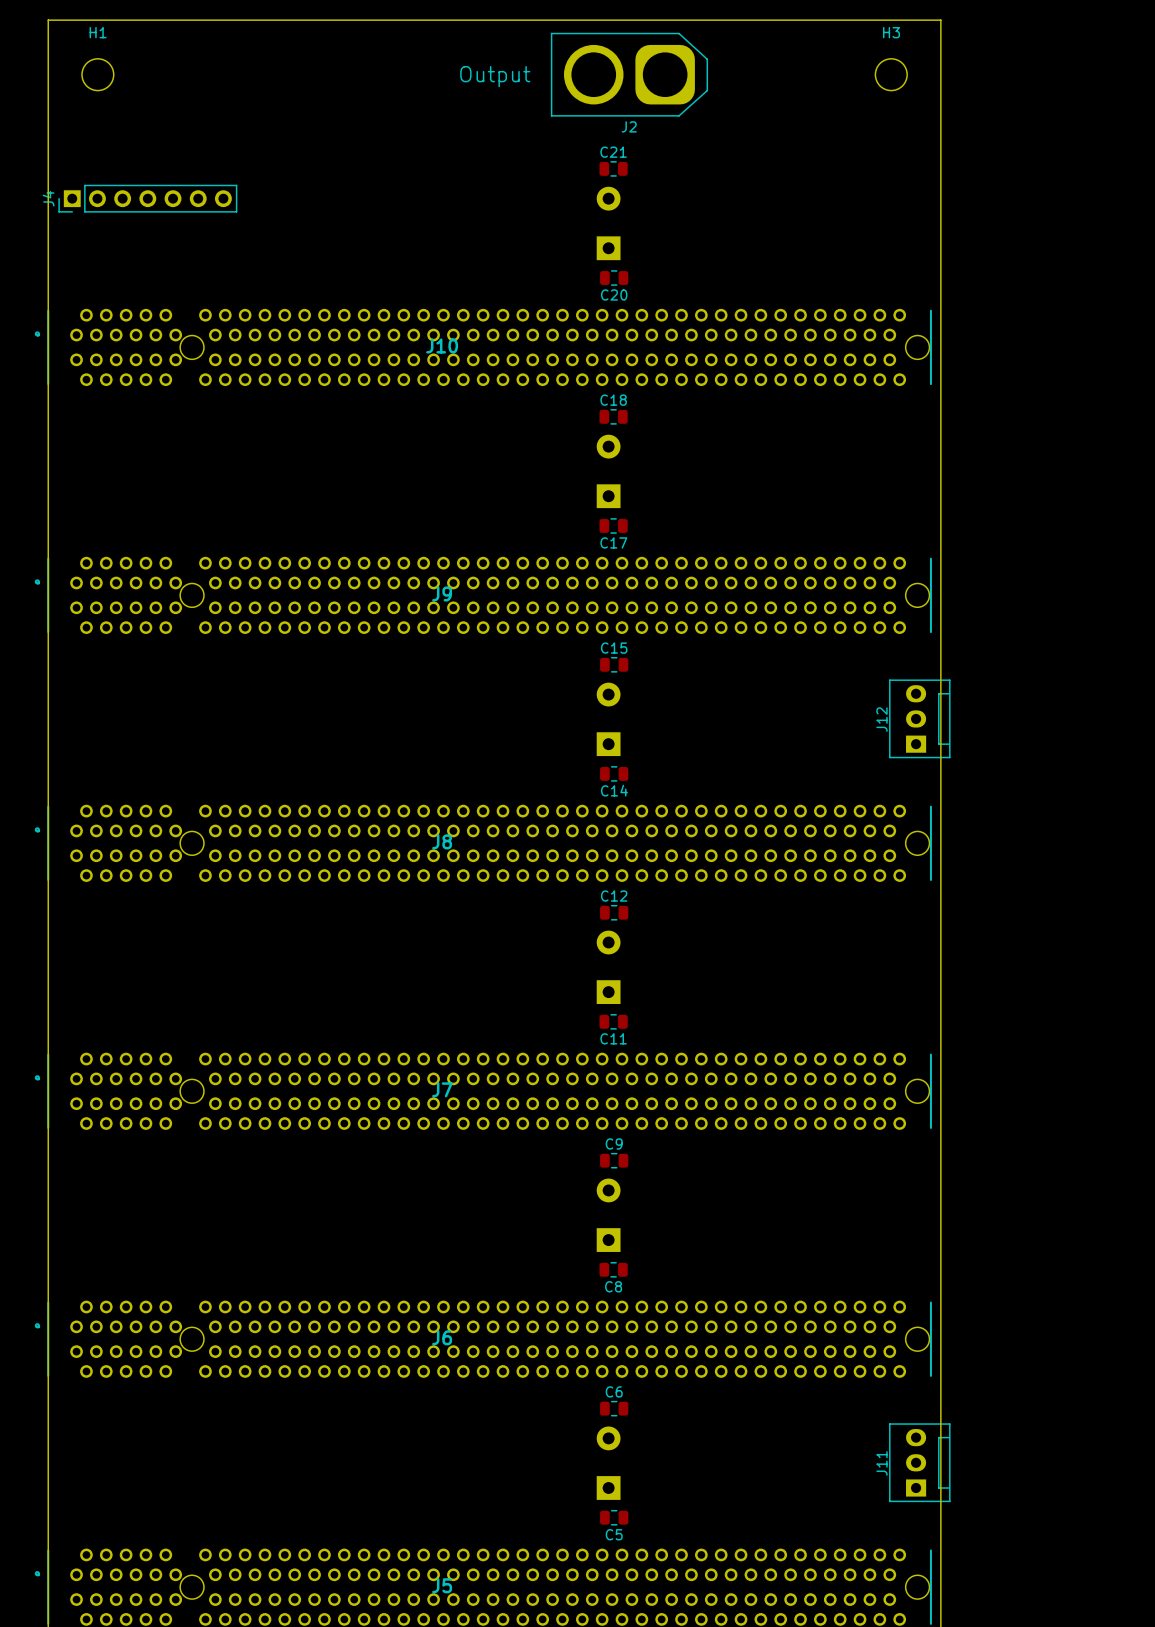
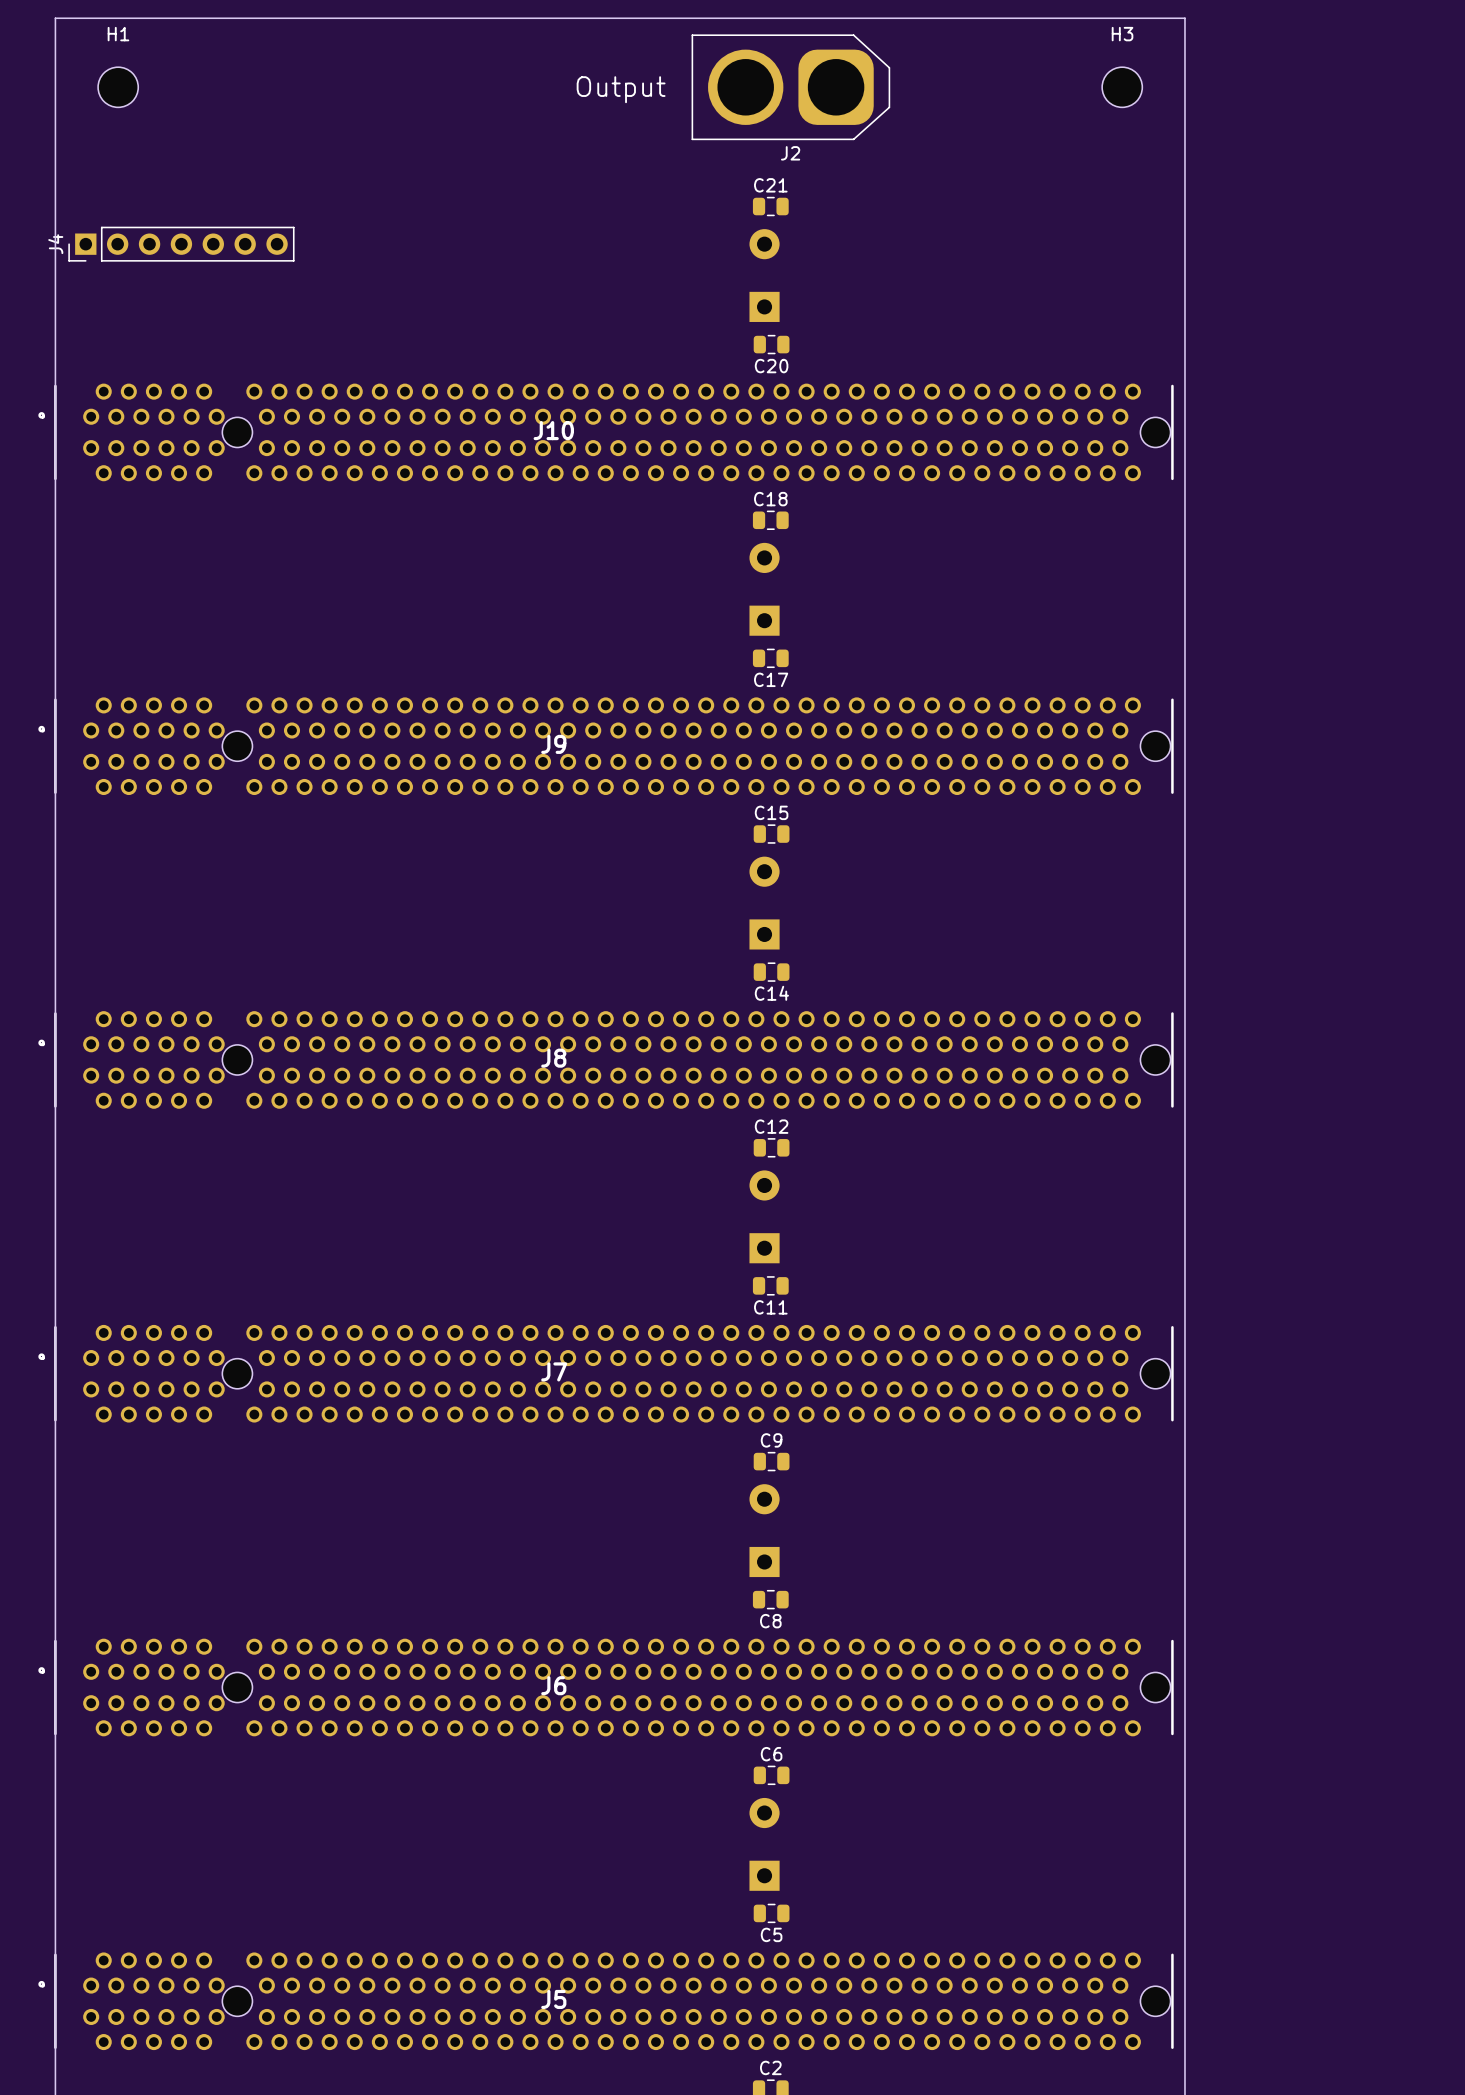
J12: (919, 718) -> none
J11: (919, 1462) -> none

